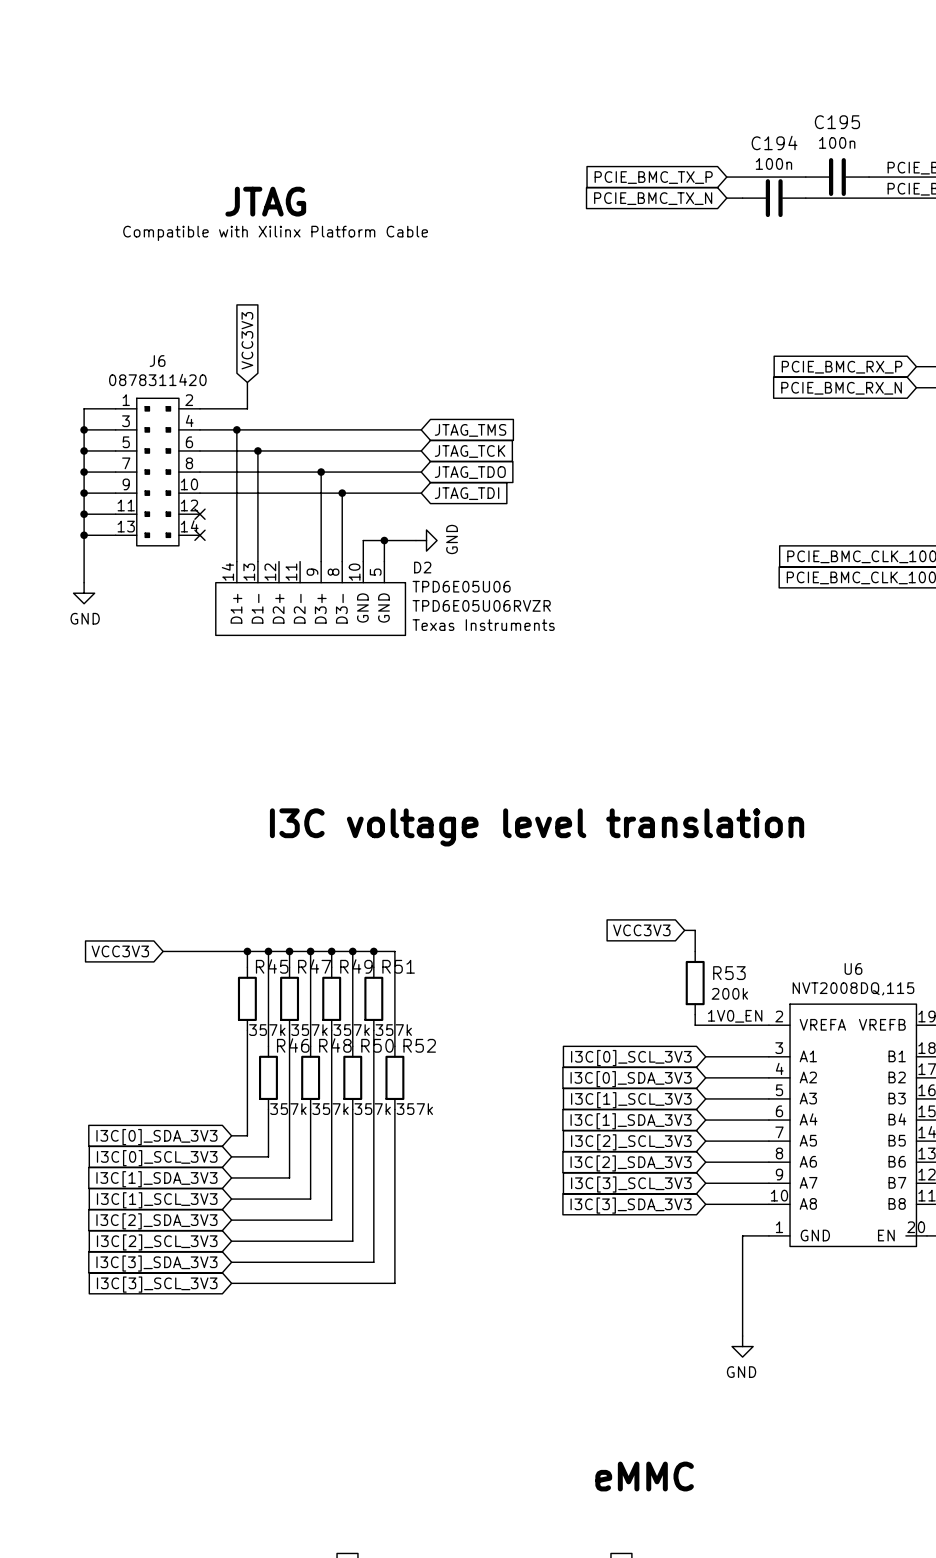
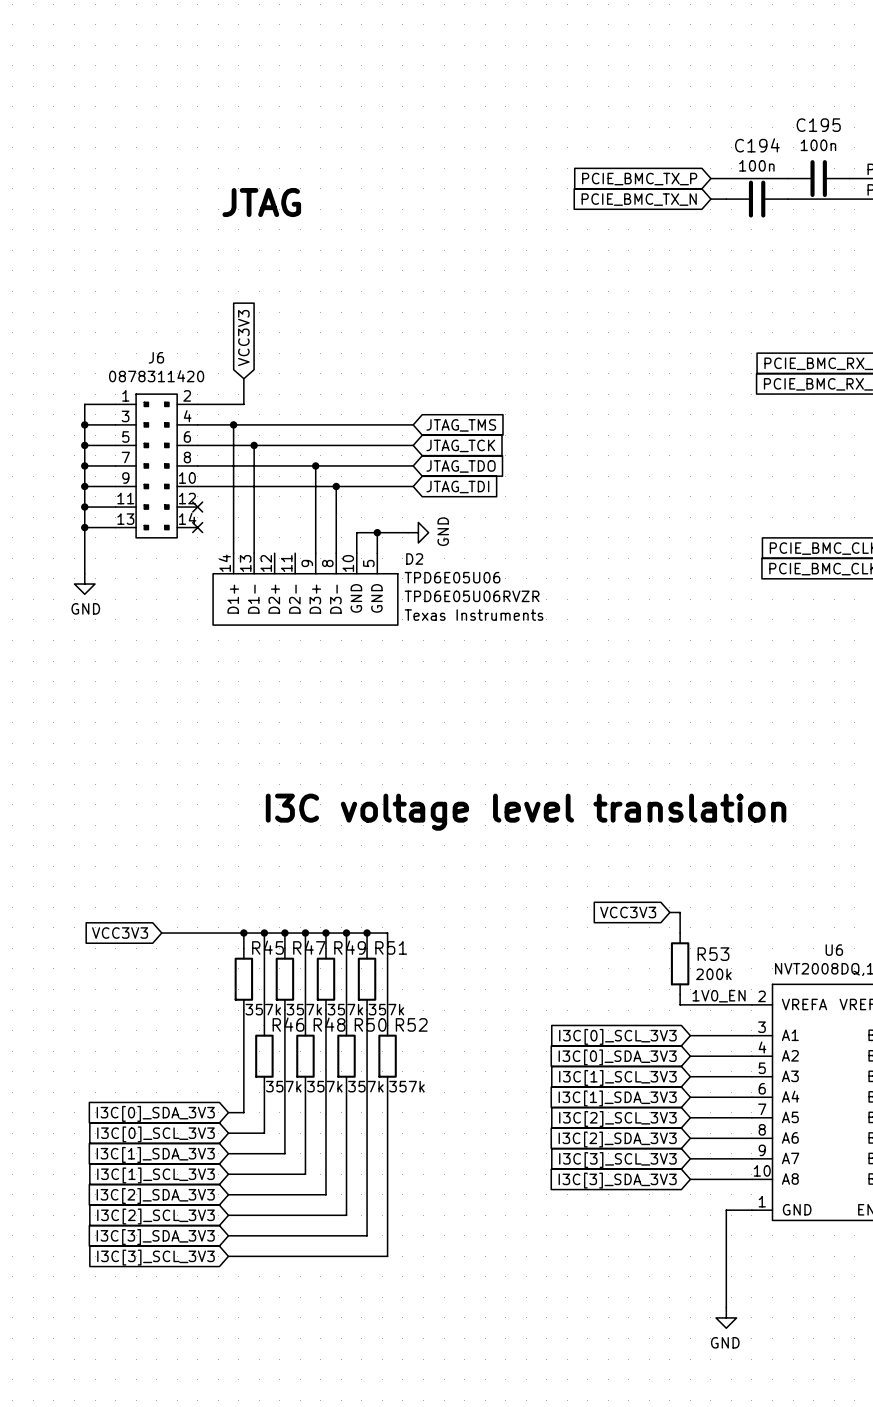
text: Compatible with Xilinx Platform Cable (275, 233) -> none

